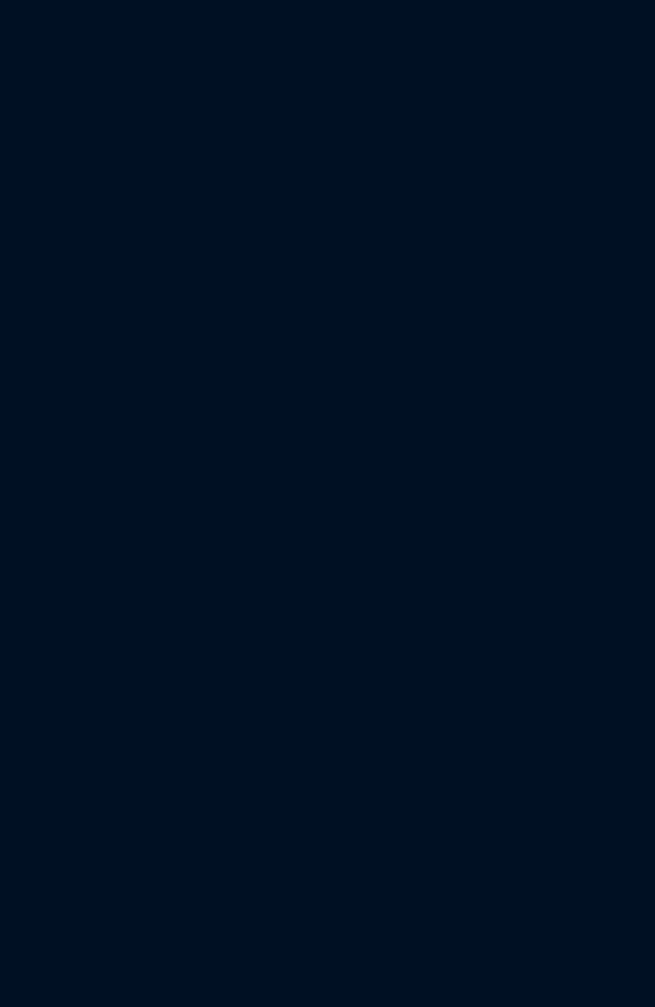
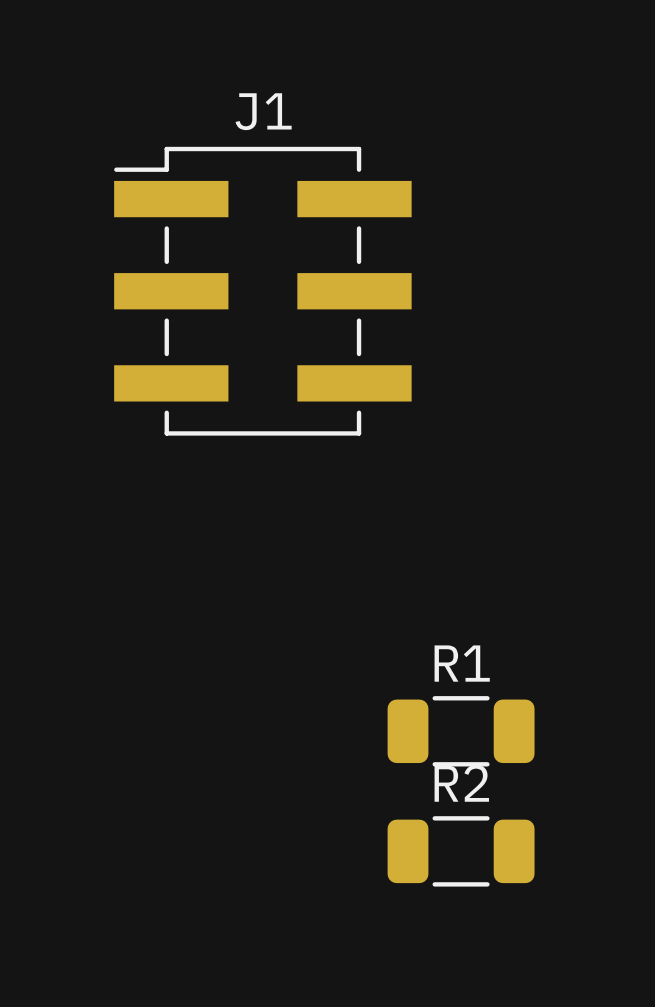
J1: none -> (262, 291)
R1: none -> (461, 731)
R2: none -> (461, 851)

